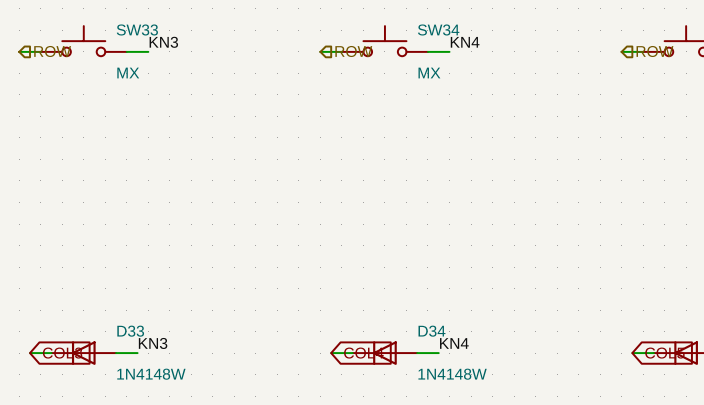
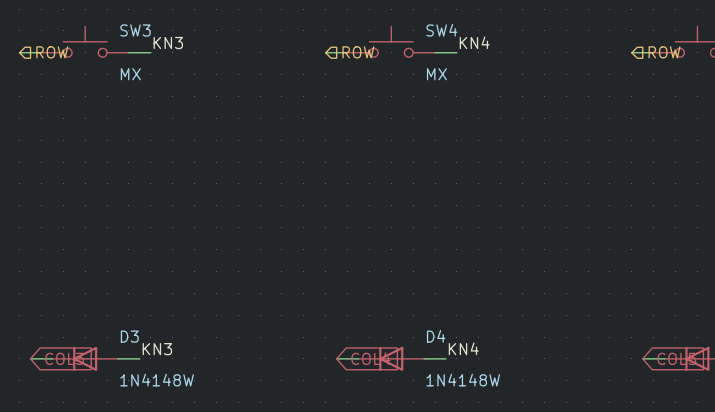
SW33 name: SW33 (137, 29) -> SW3 (135, 30)
SW34 name: SW34 (438, 29) -> SW4 (441, 30)
D33 name: D33 (130, 331) -> D3 (129, 336)
D34 name: D34 (431, 331) -> D4 (436, 336)

